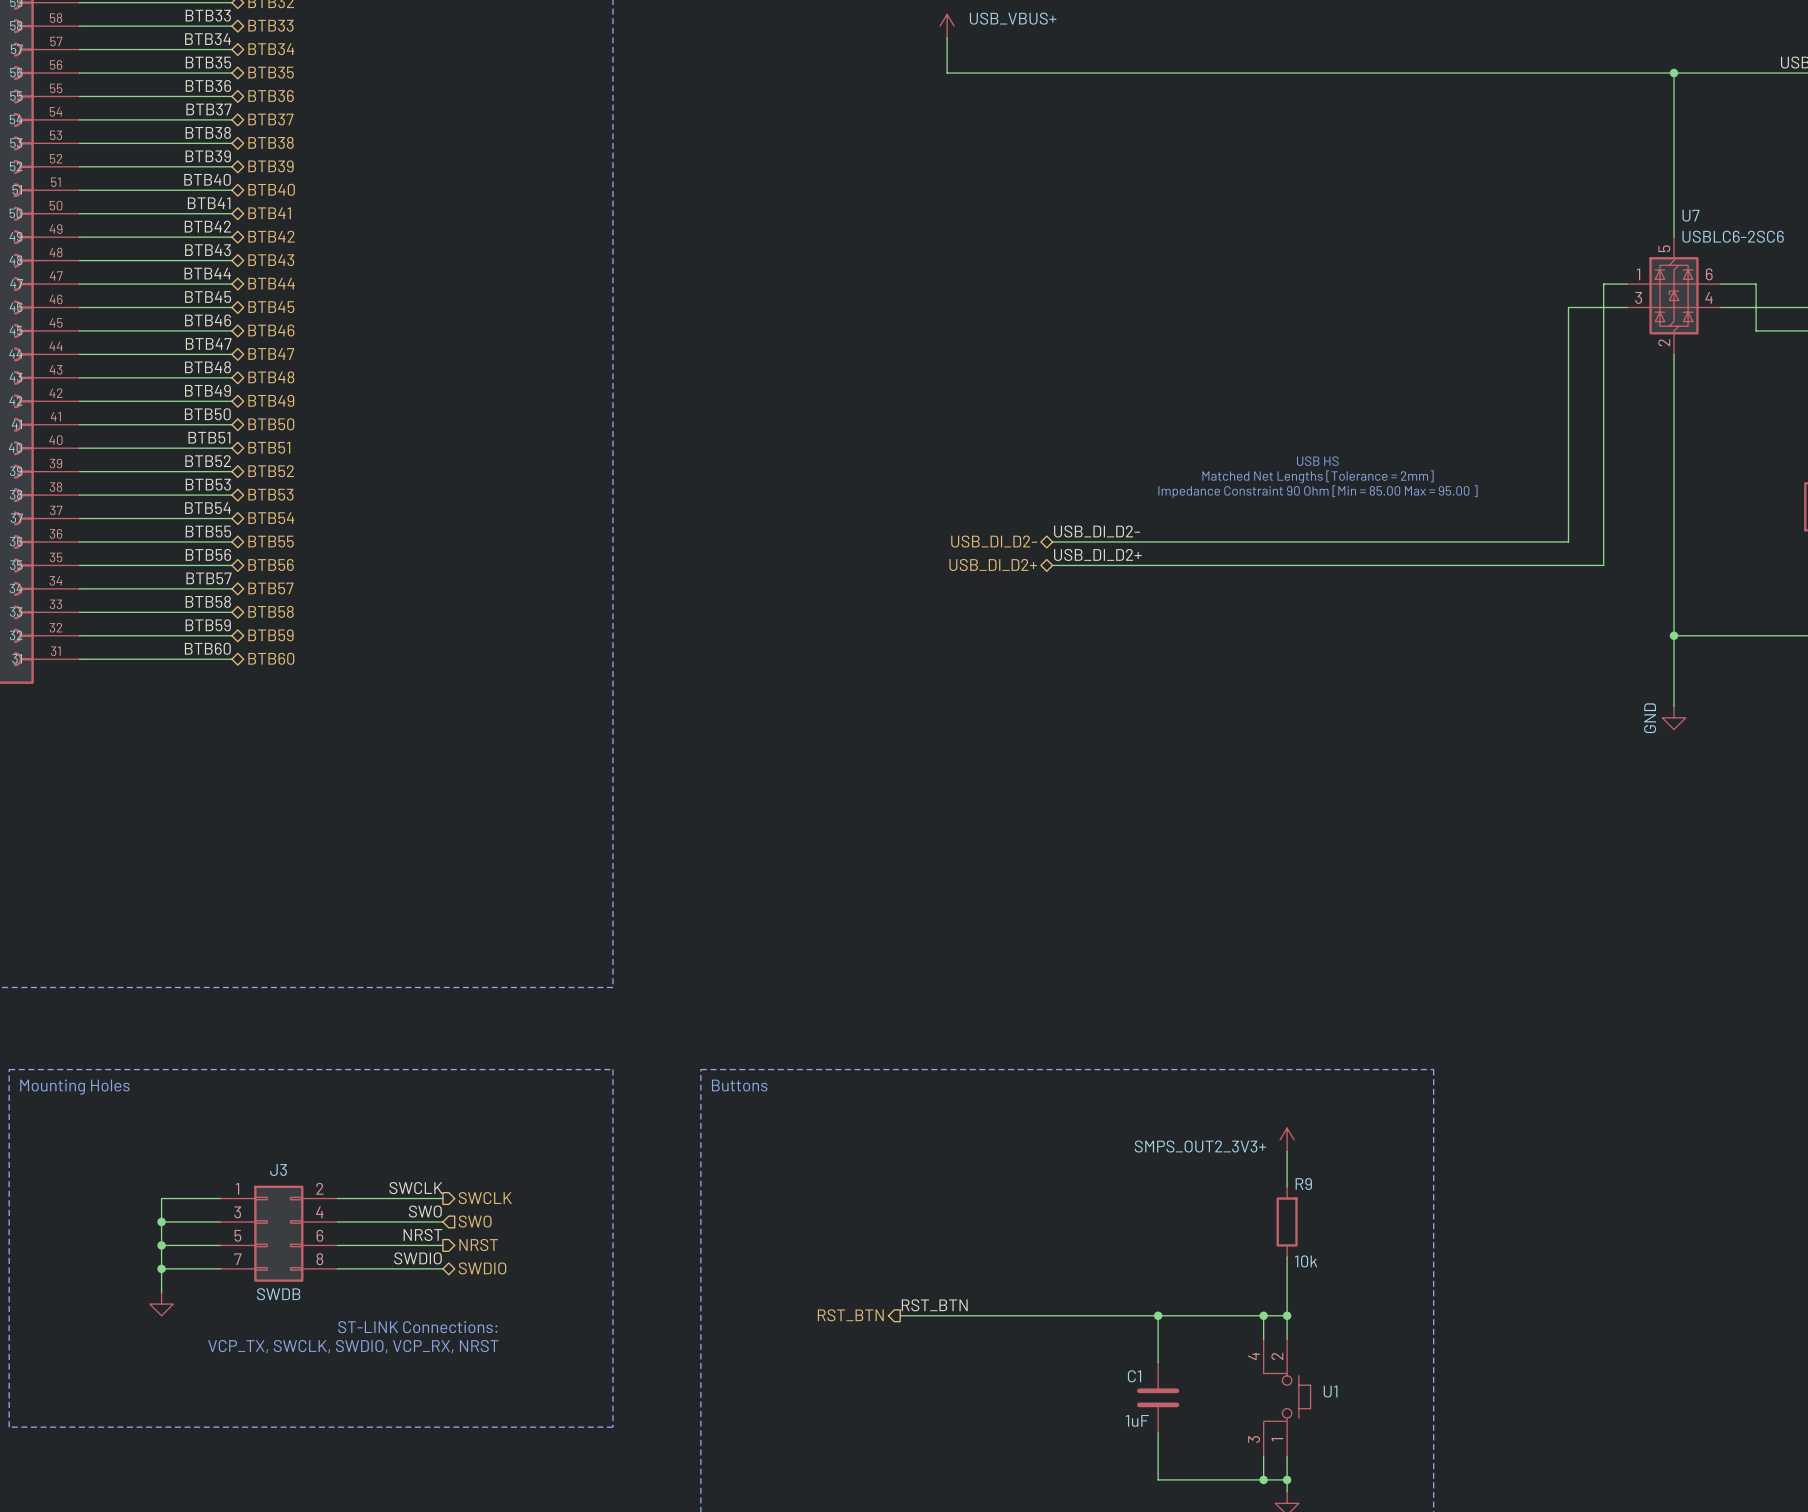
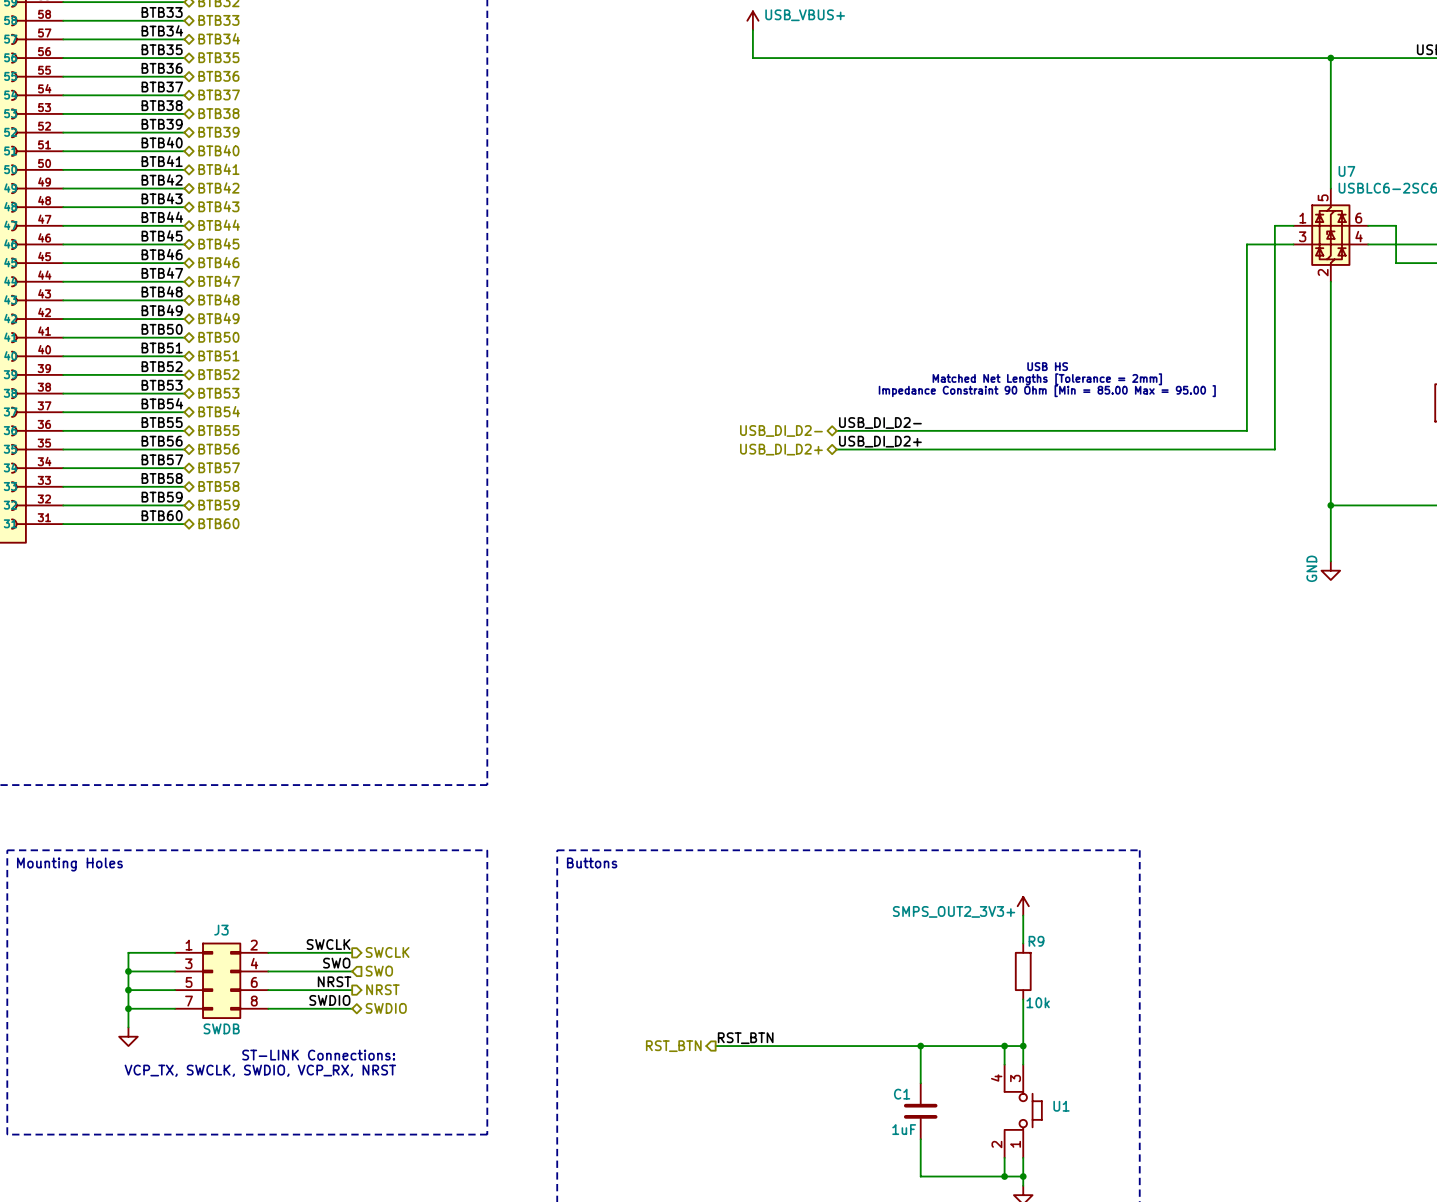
U1 pin number: 2 (1277, 1356) -> 3 (1015, 1078)
U1 pin number: 3 (1254, 1439) -> 2 (996, 1144)

